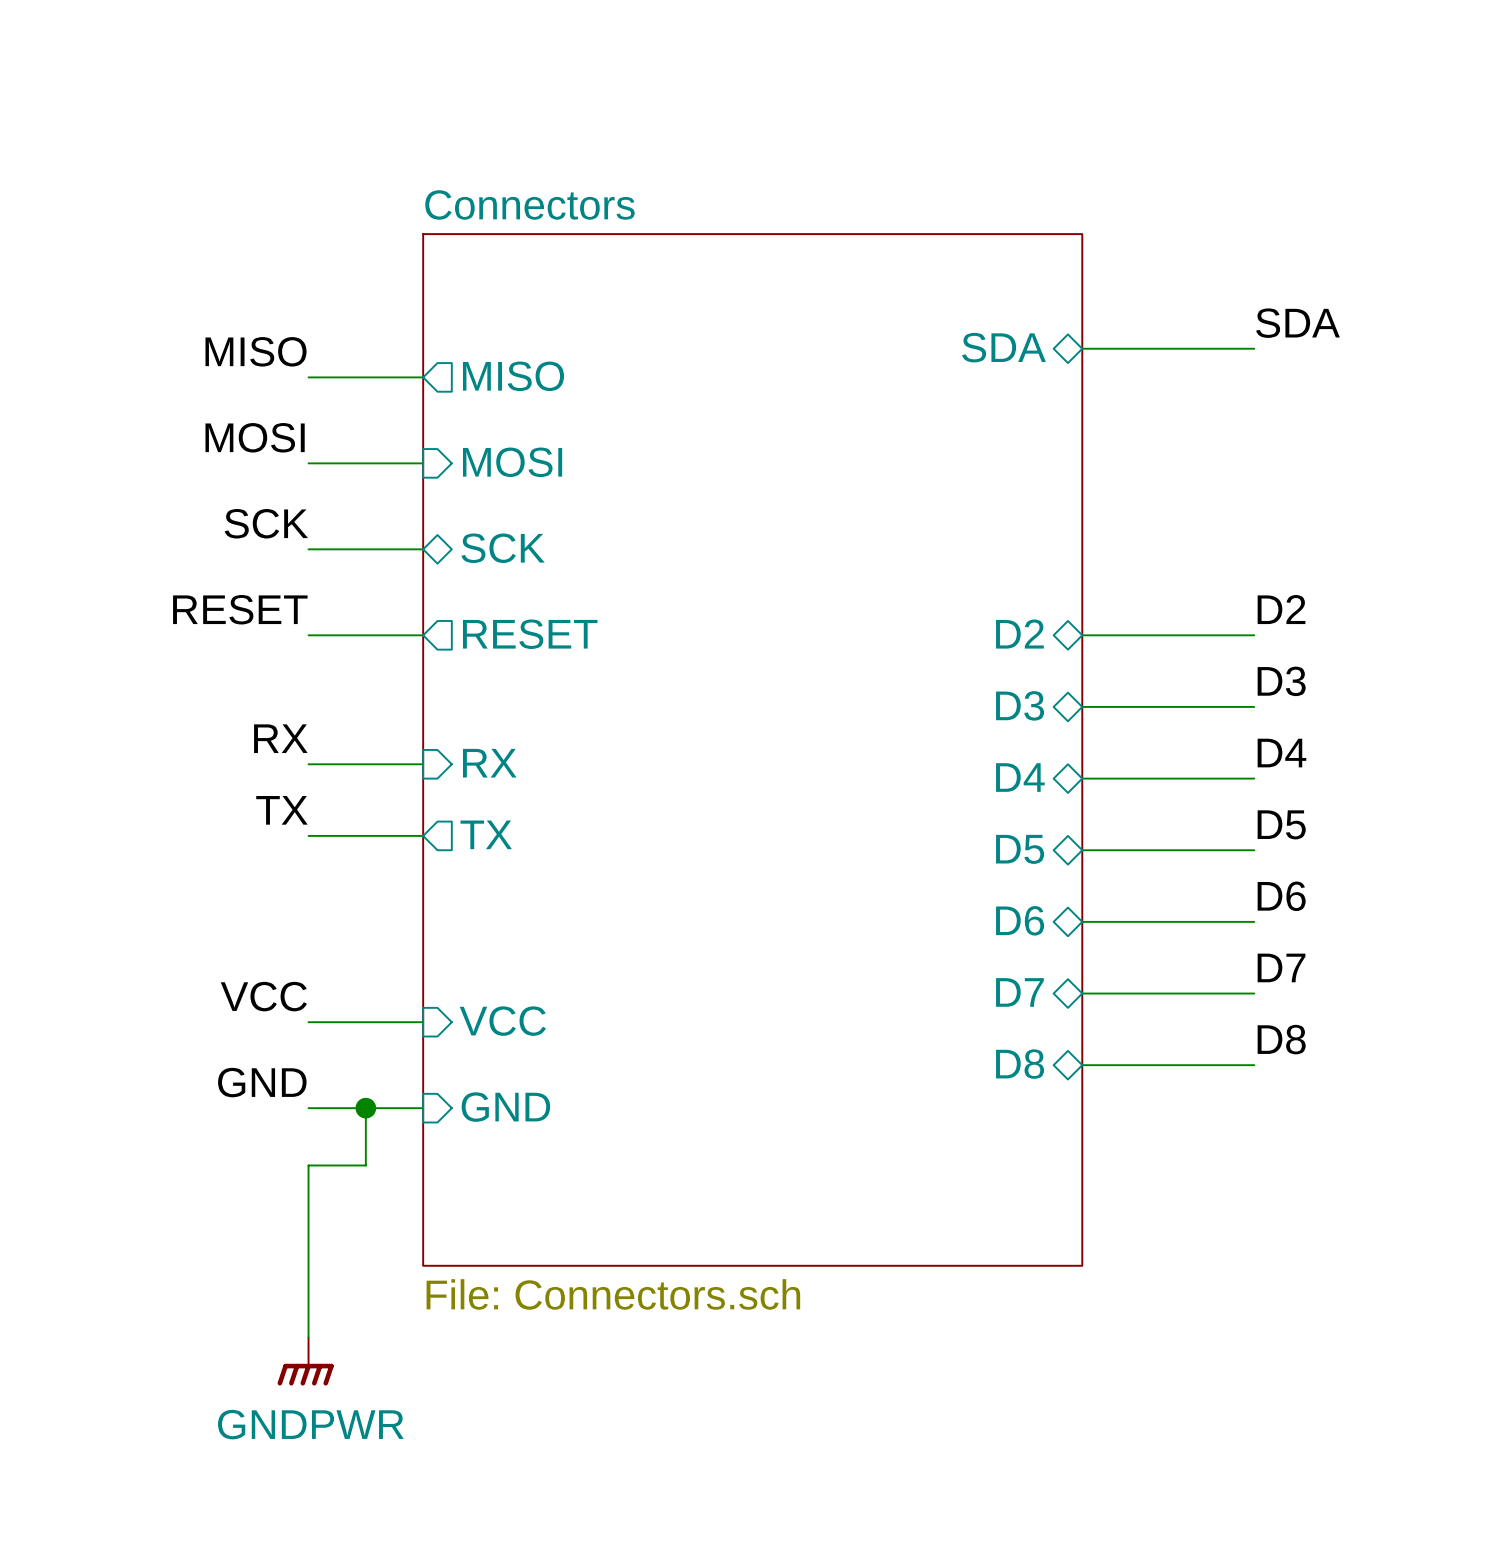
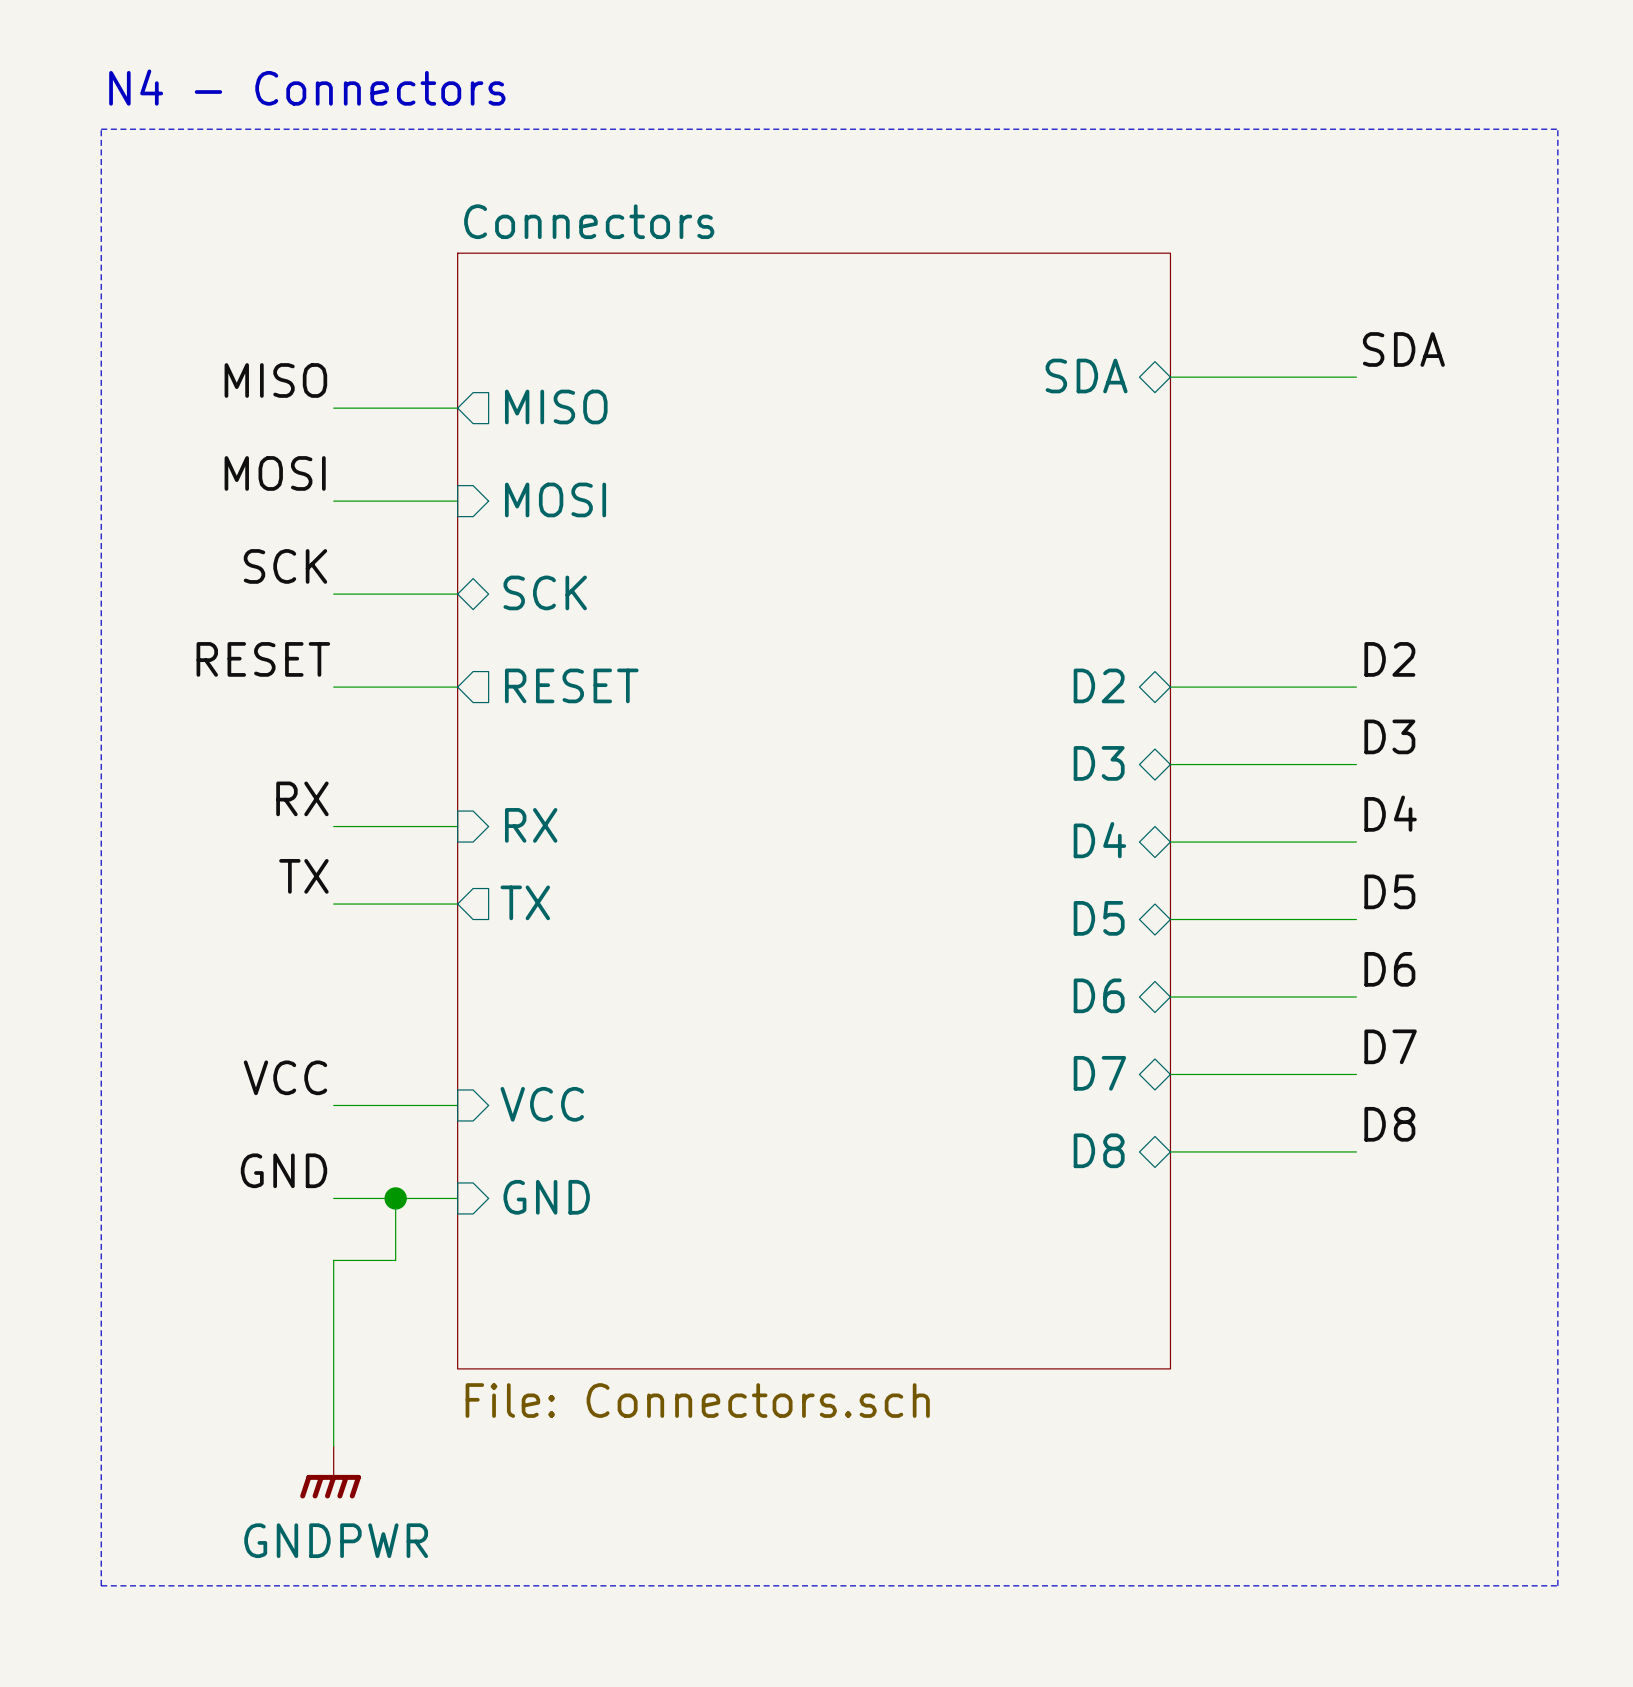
text: none -> N4 - Connectors (307, 87)
line: none -> (101, 129) (101, 1585) (1557, 1585) (1557, 129) (101, 129)

